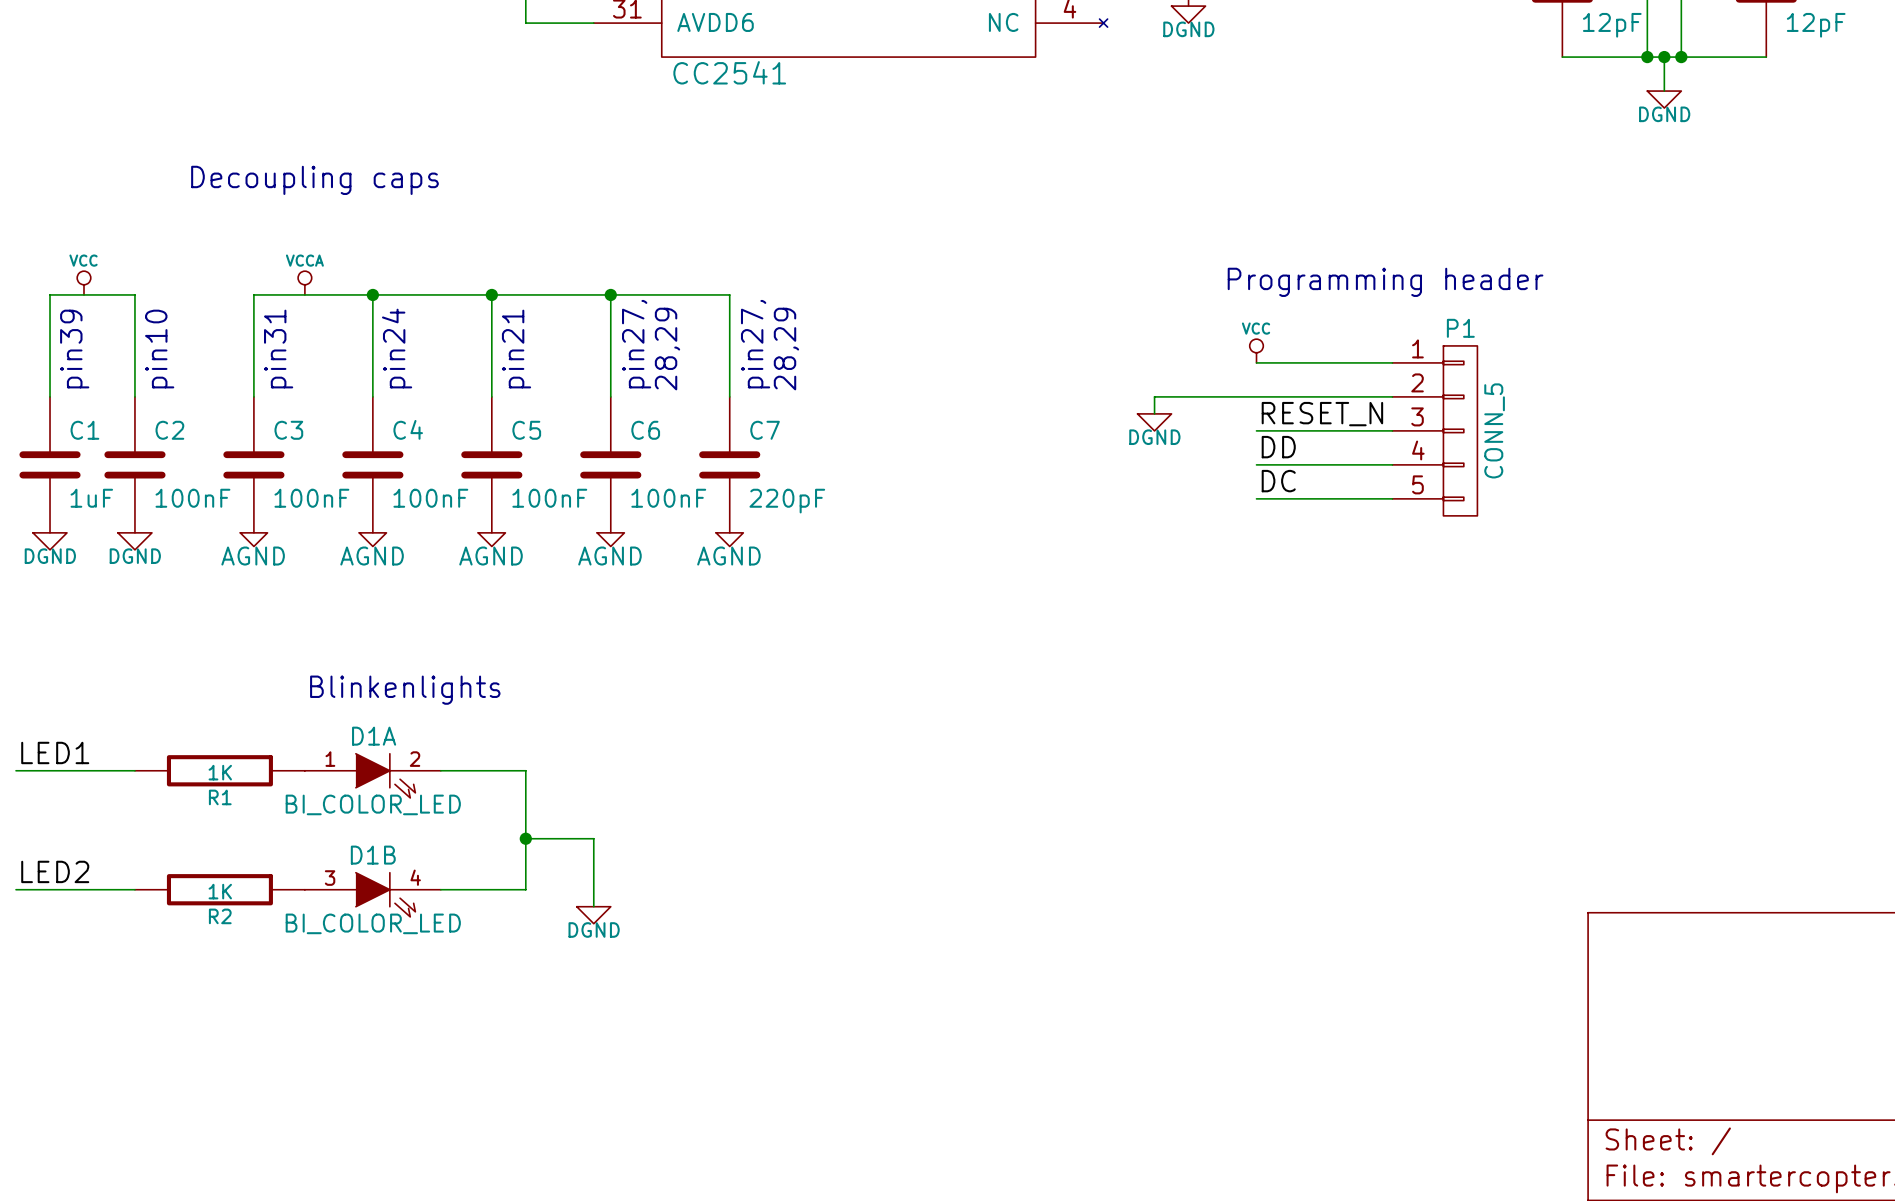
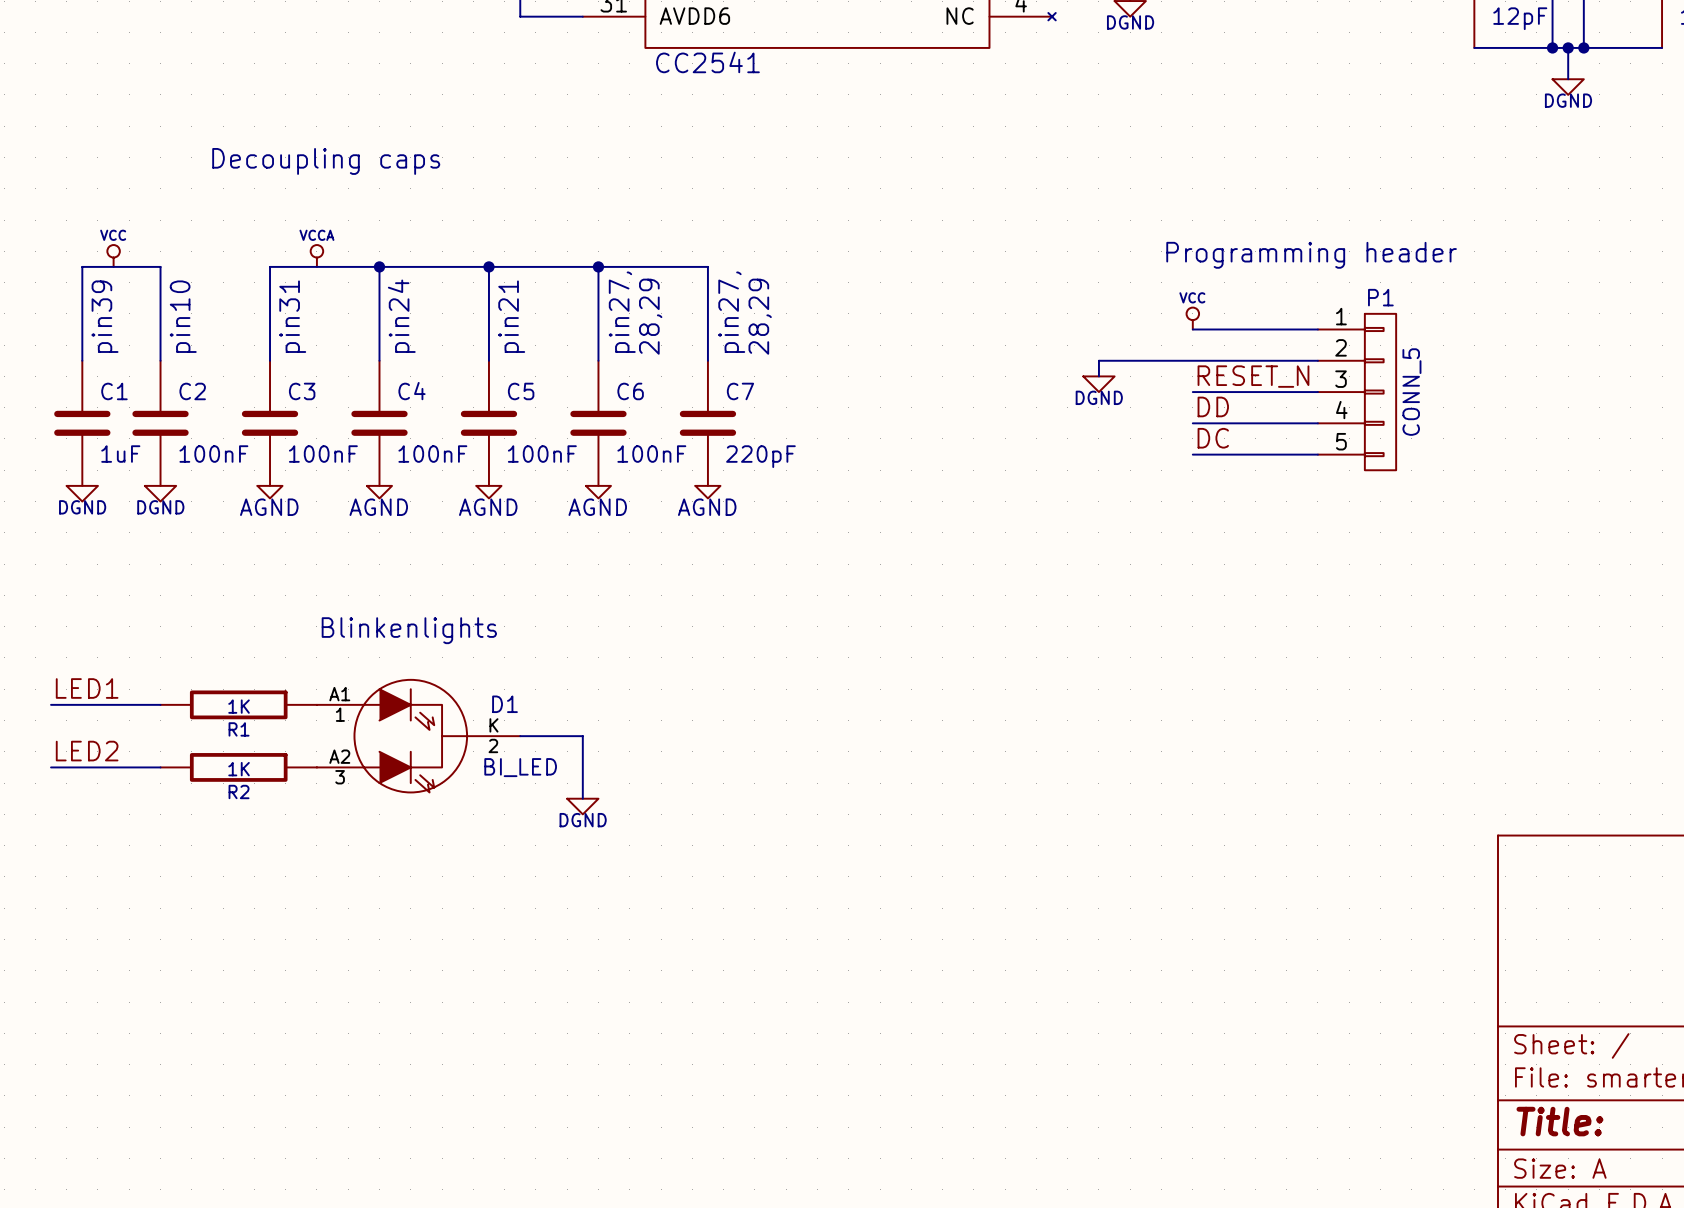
wire: (440, 770) (525, 770) (525, 889) (440, 889) -> none
D1A: BI_COLOR_LED (372, 775) -> none
D1: none -> BI_LED (418, 736)
wire: (525, 838) (593, 838) -> (520, 736) (582, 736) (582, 767)
junction: (525, 838) -> none
label position: LED2 (55, 871) -> LED2 (87, 751)
wire: (593, 872) (593, 906) -> none
wire: (16, 889) (134, 889) -> (51, 767) (160, 767)
R2 position: (219, 889) -> (238, 767)
D1B: BI_COLOR_LED (372, 894) -> none
power symbol position: DGND (593, 915) -> DGND (582, 806)

